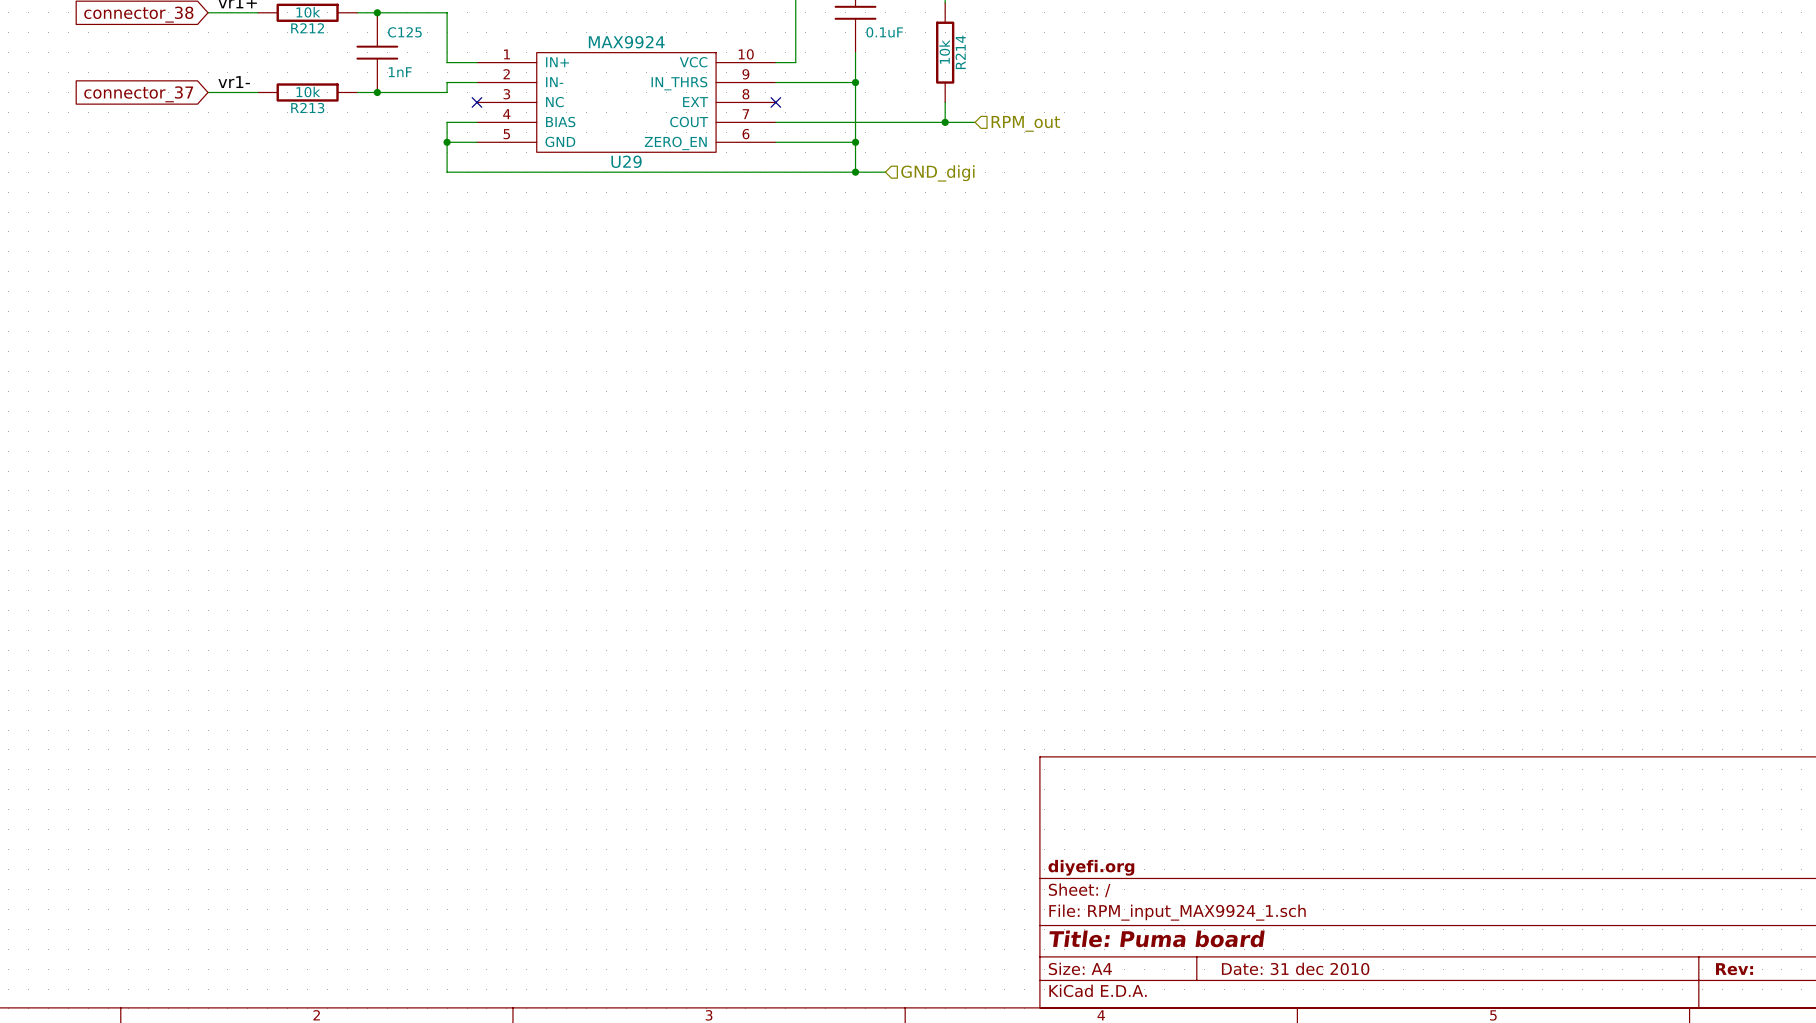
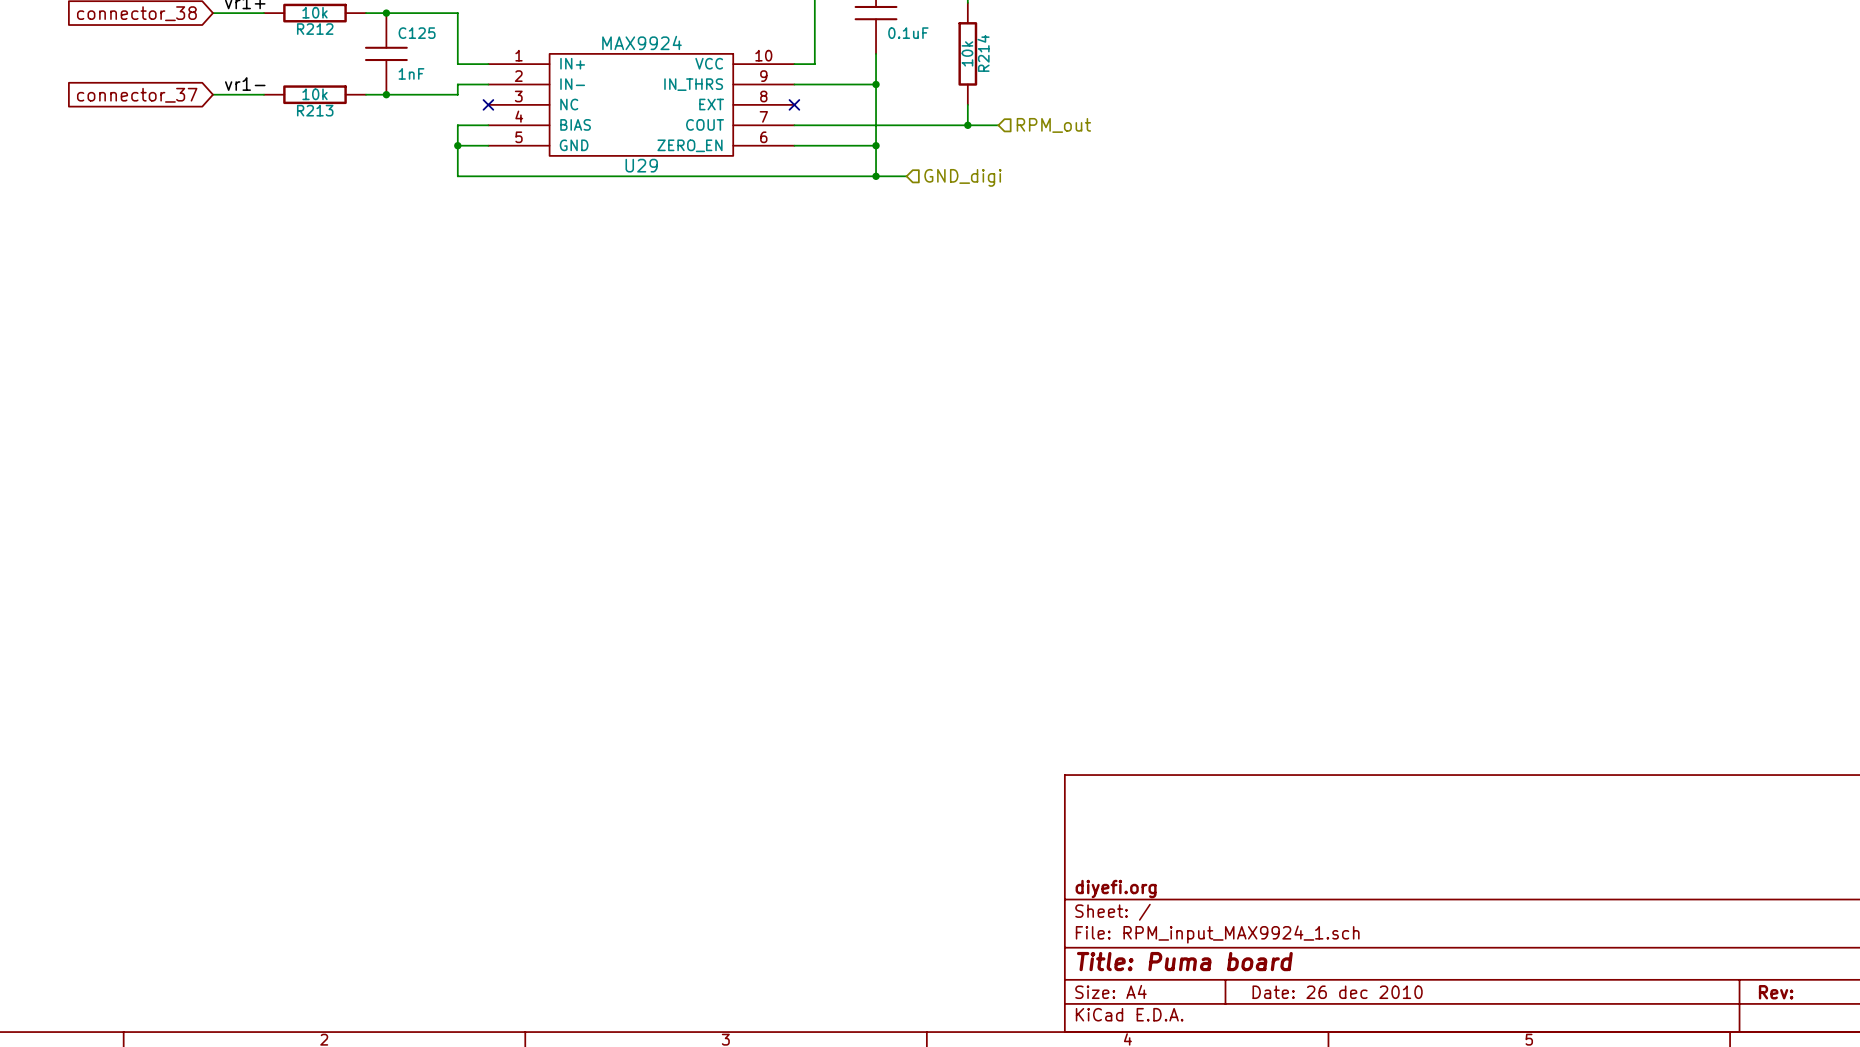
title block: Date: 31 dec 2010 (1295, 968) -> Date: 26 dec 2010 (1337, 992)

